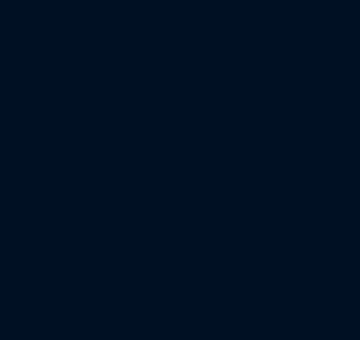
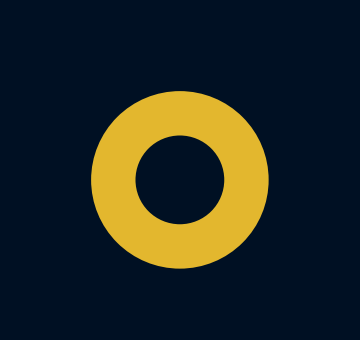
part: none -> (179, 179)

